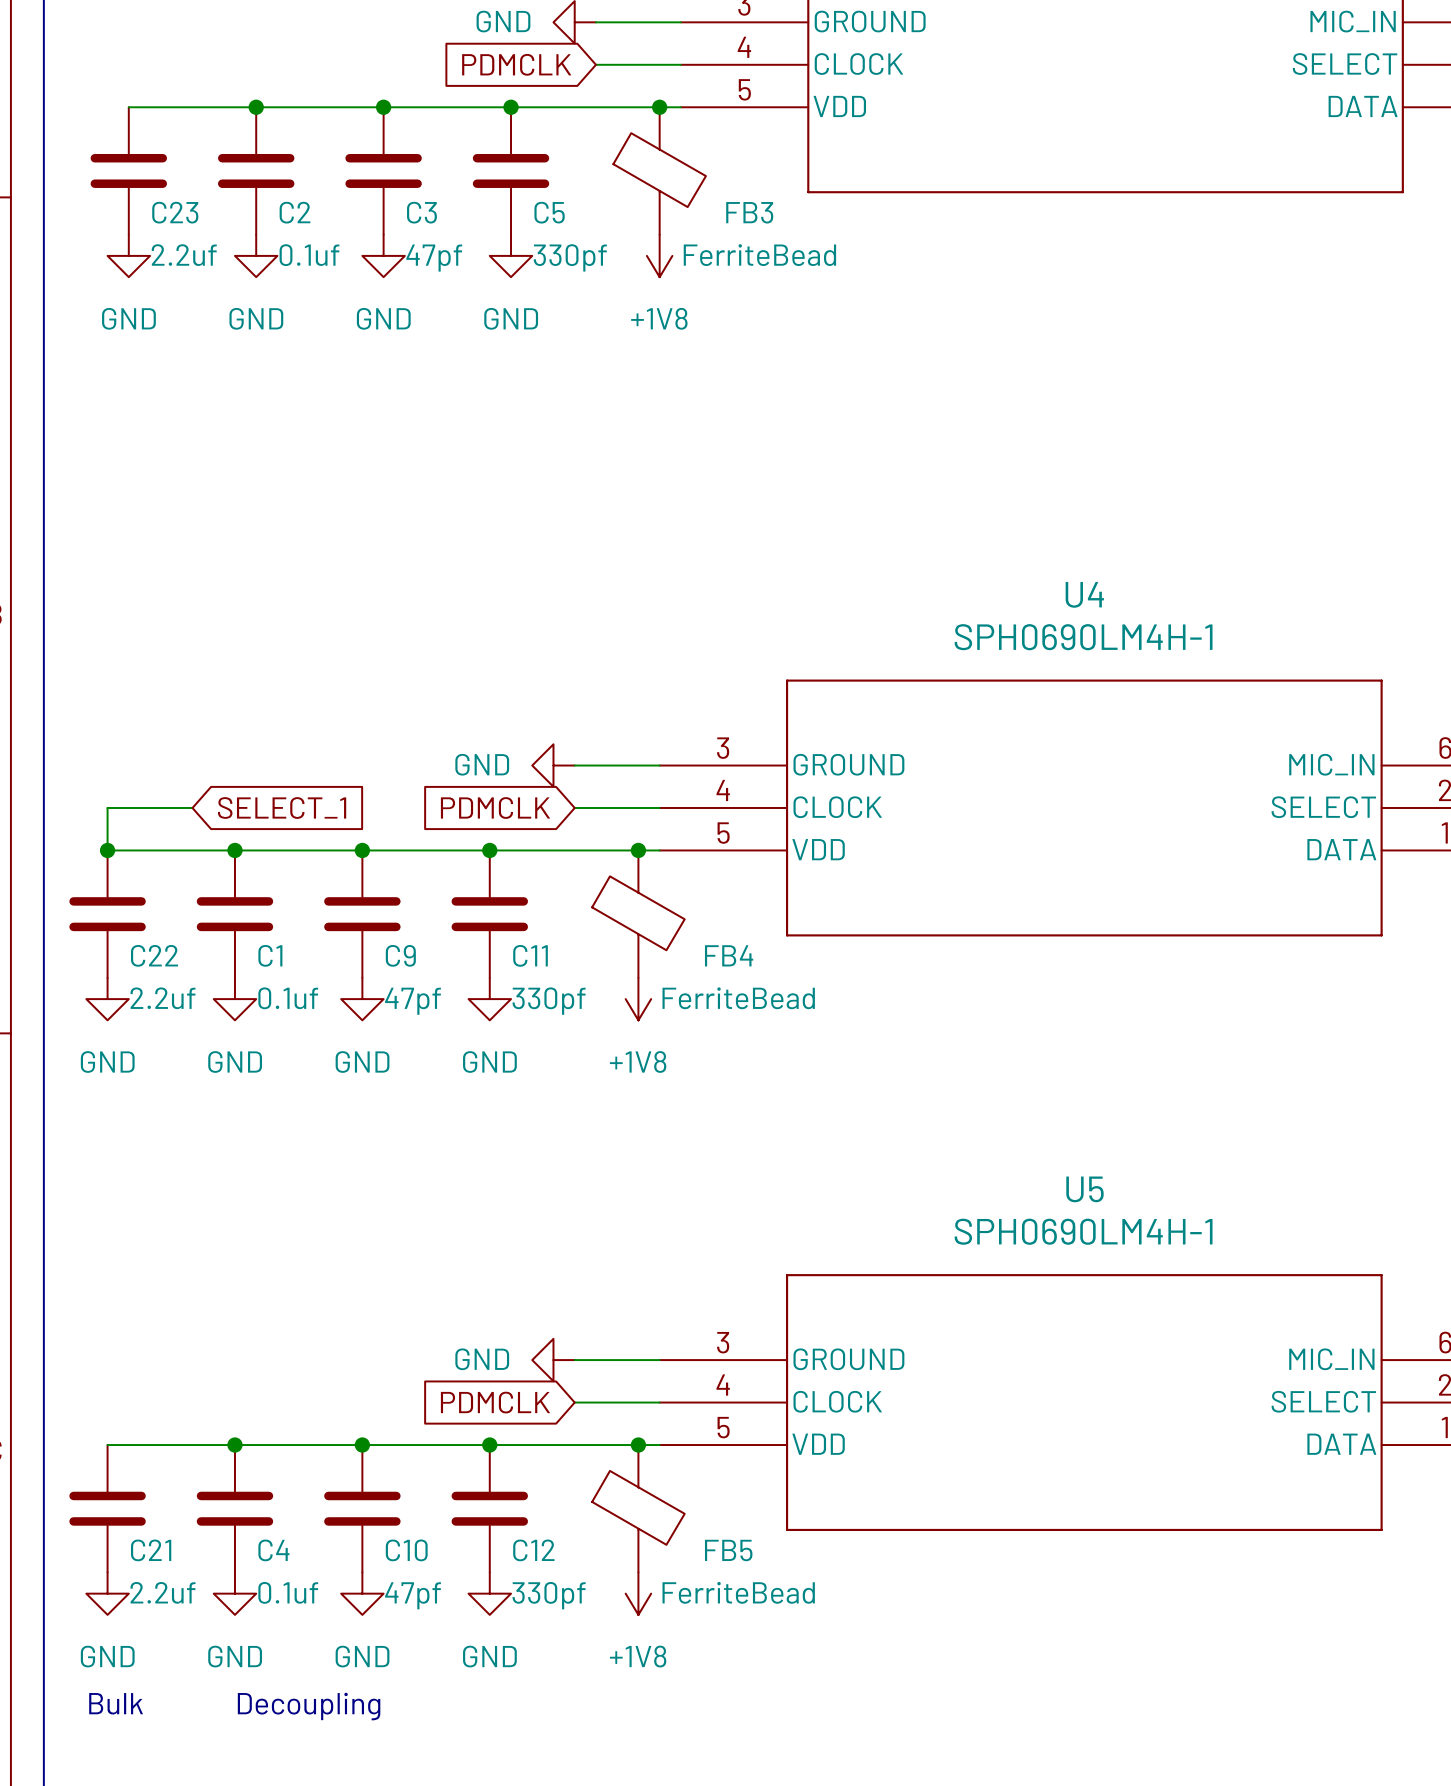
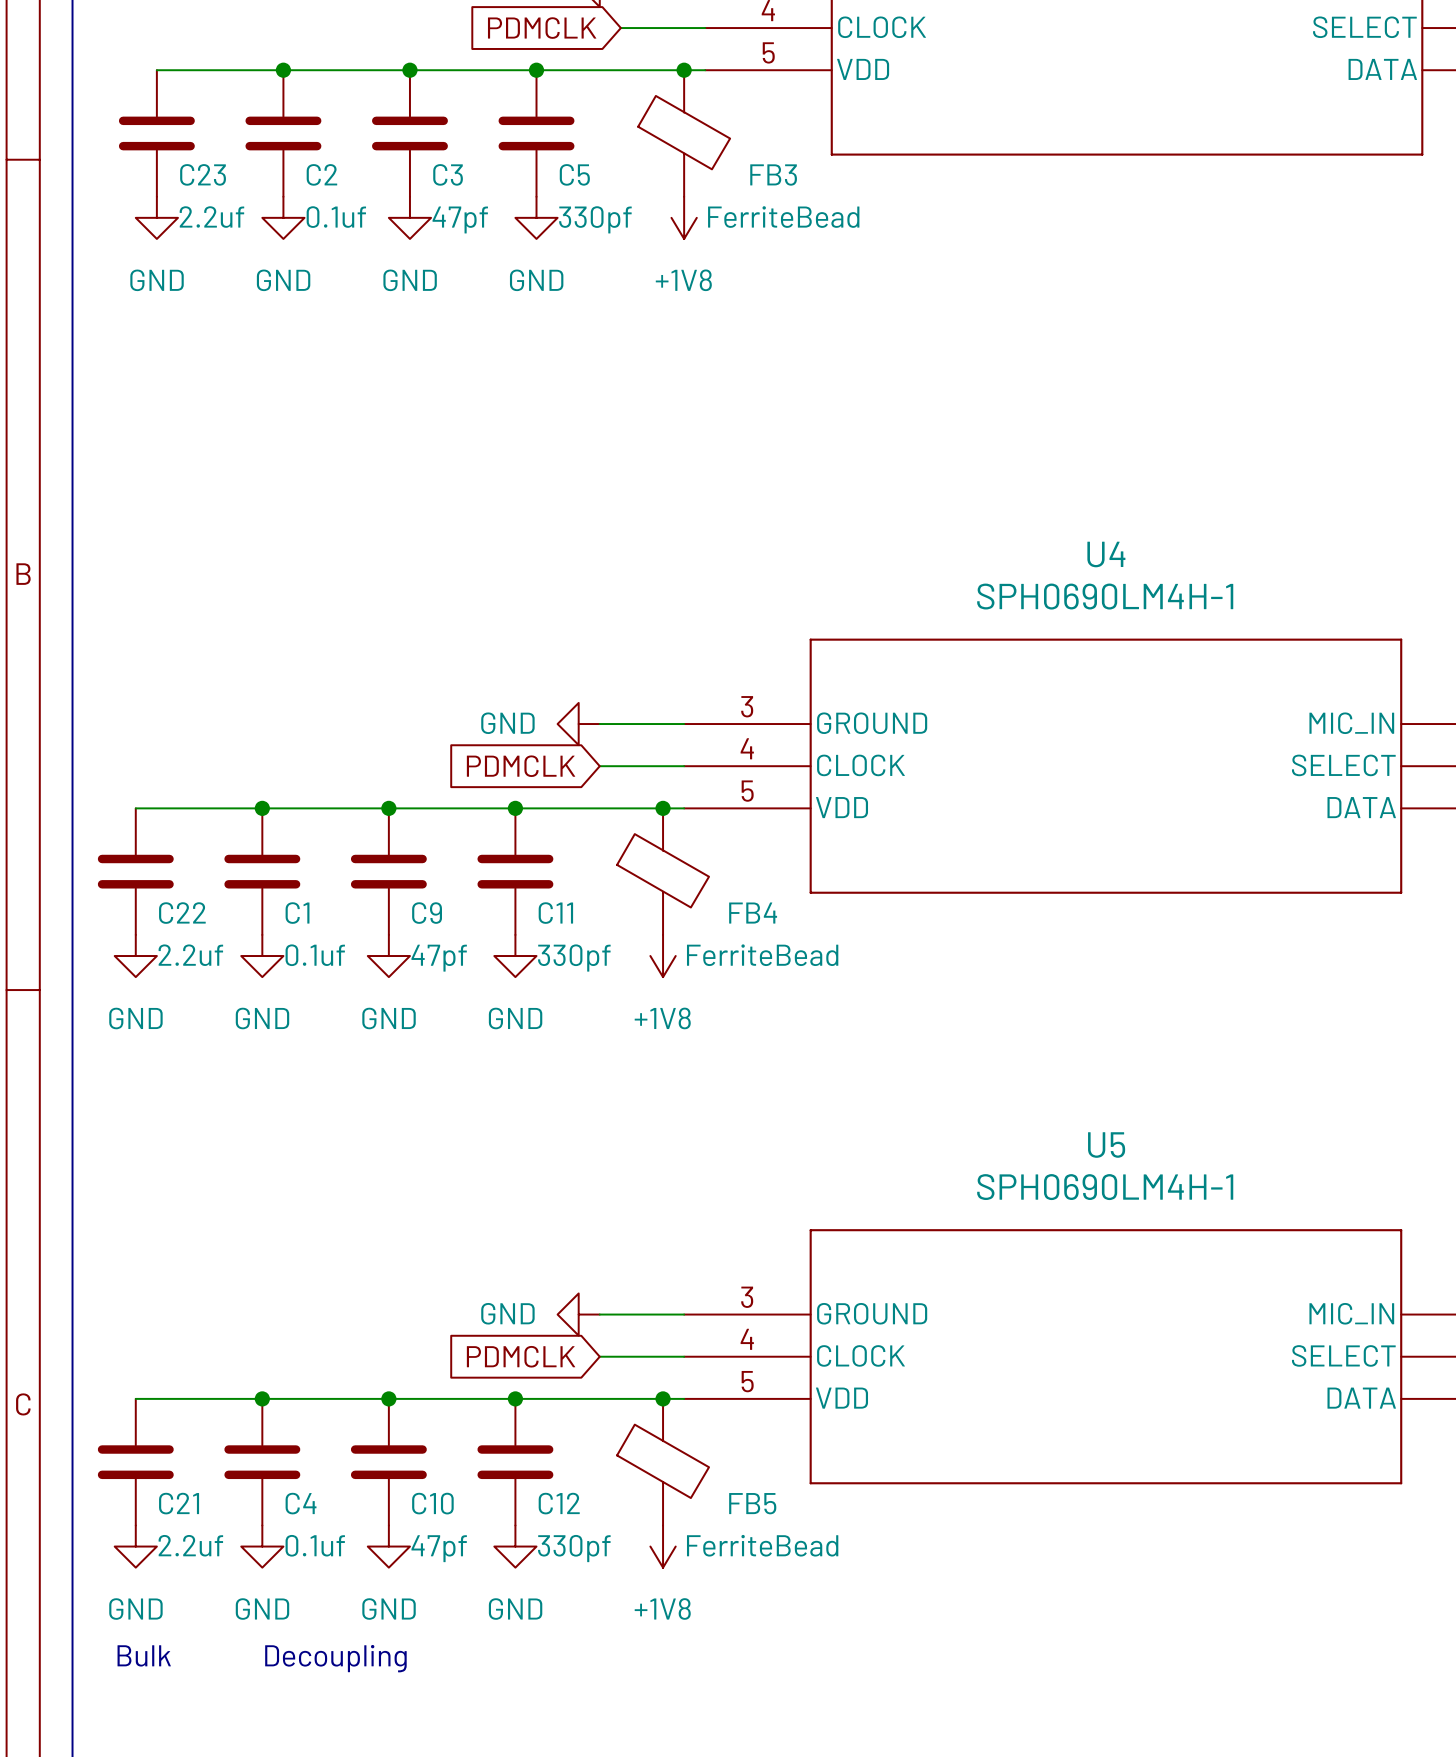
wire: (192, 807) (107, 807) (107, 850) -> none
global label: SELECT_1 (282, 808) -> none
junction: (107, 850) -> none

